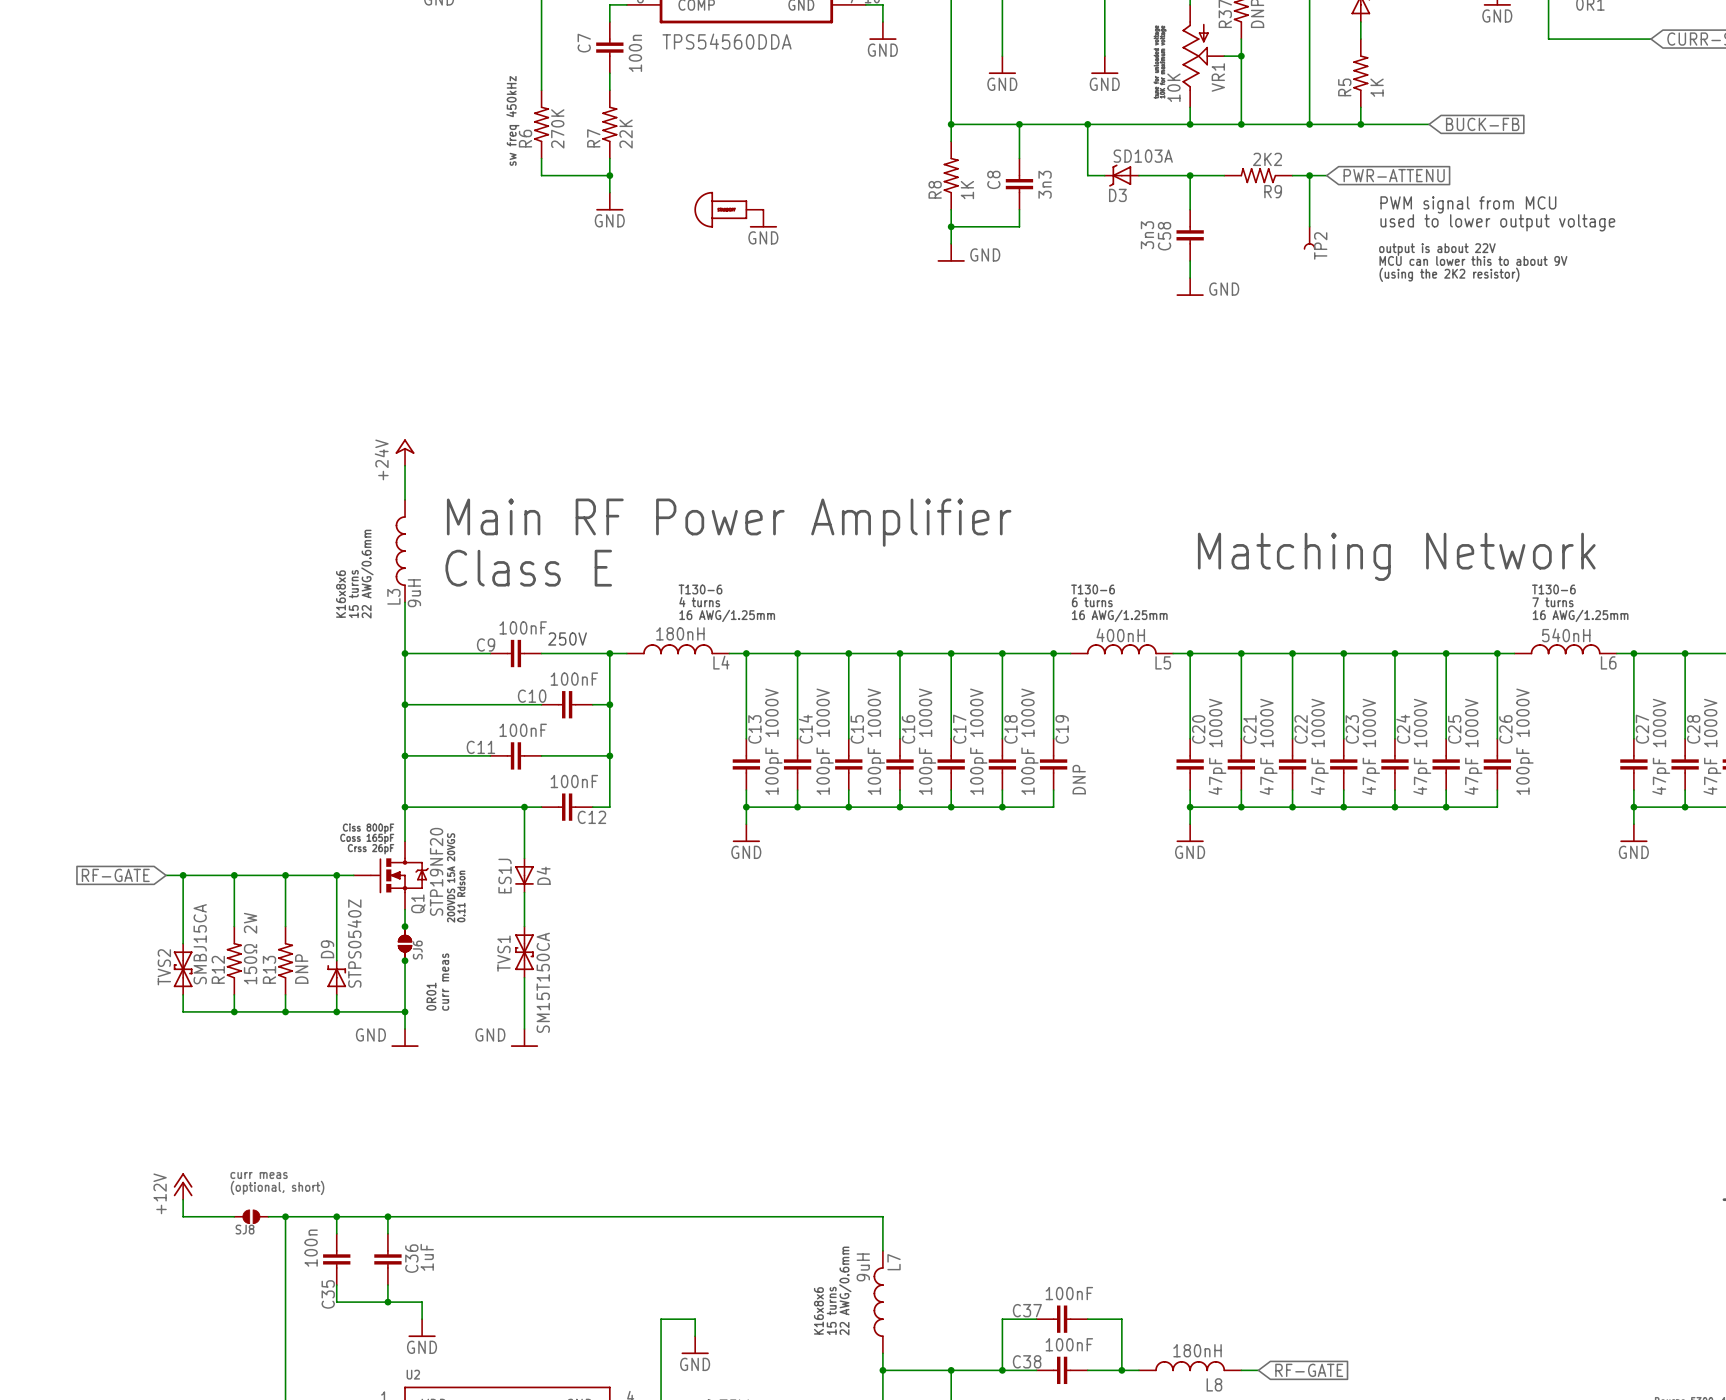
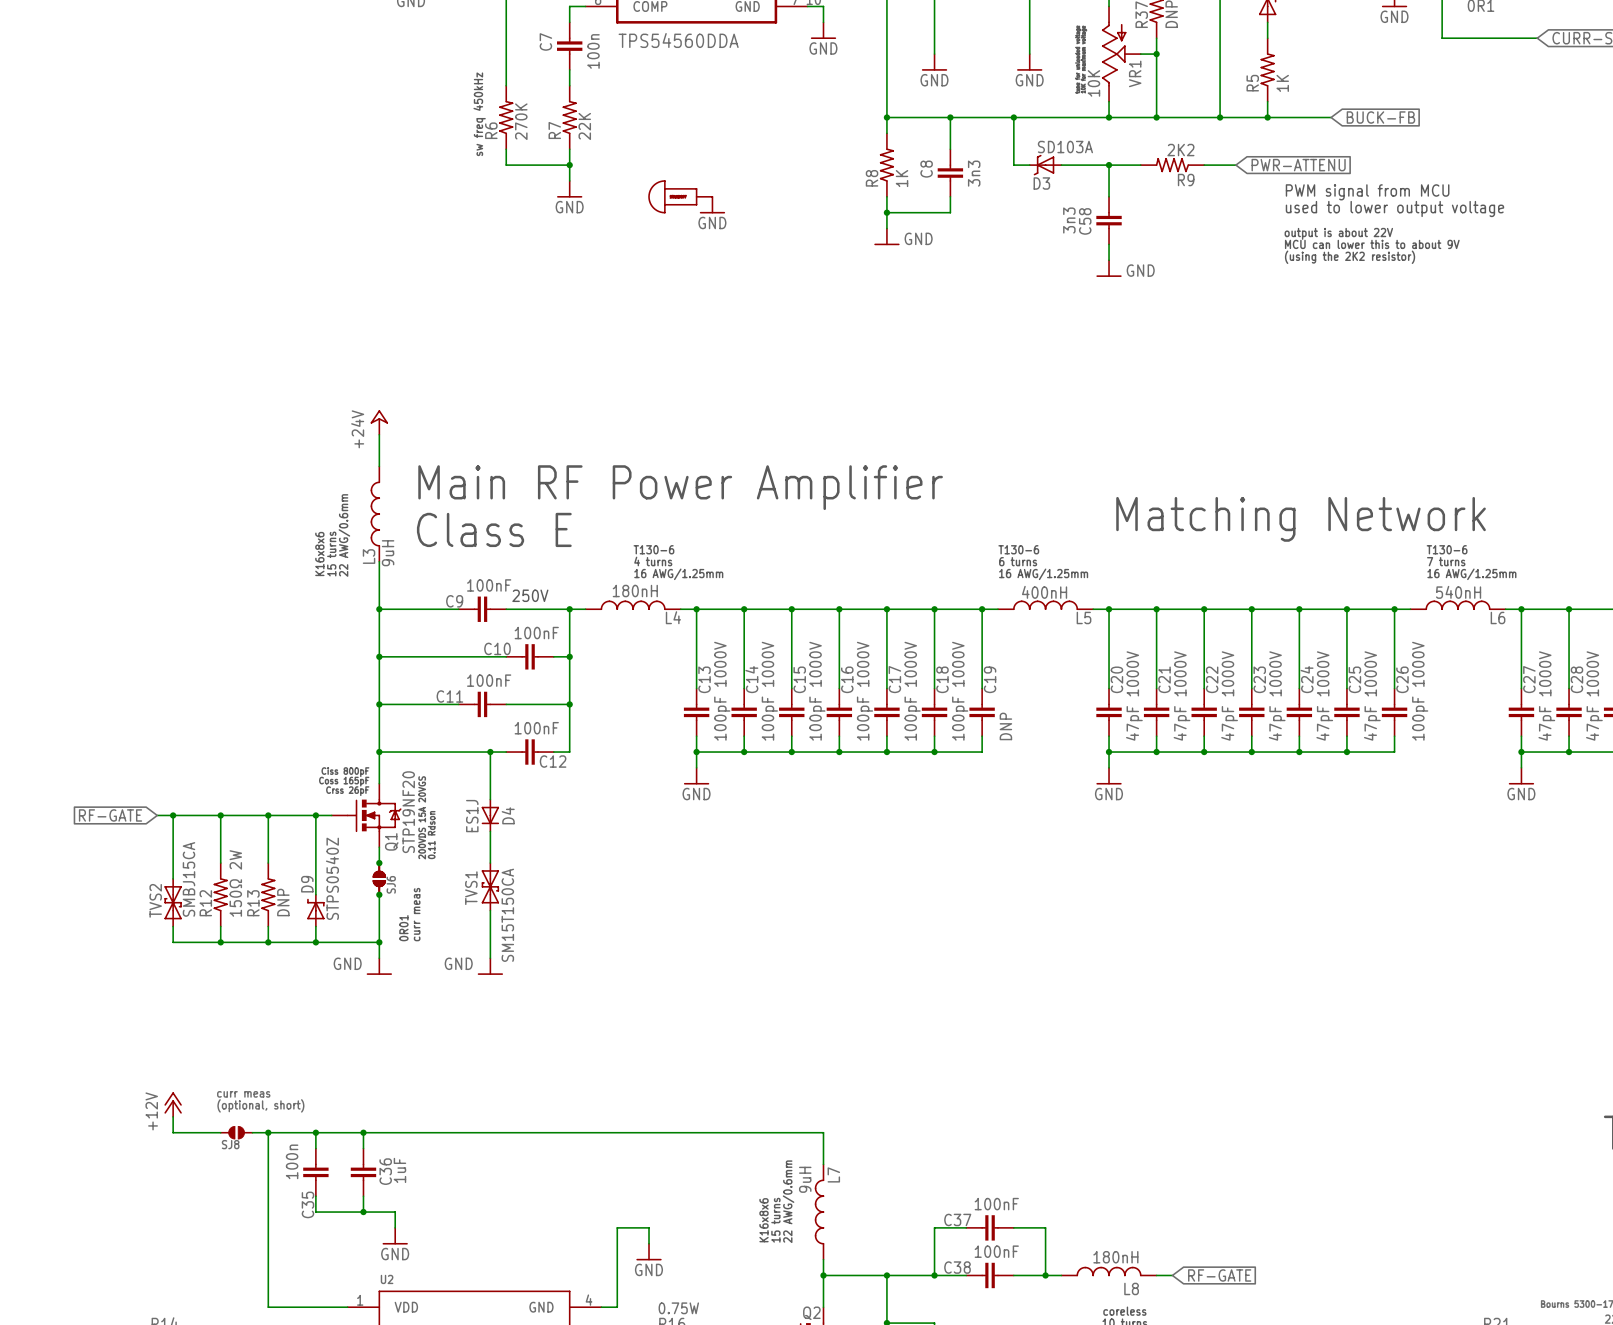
wire: (1309, 175) (1309, 226) -> none
junction: (1309, 175) -> none
TP2: (1309, 237) -> none

